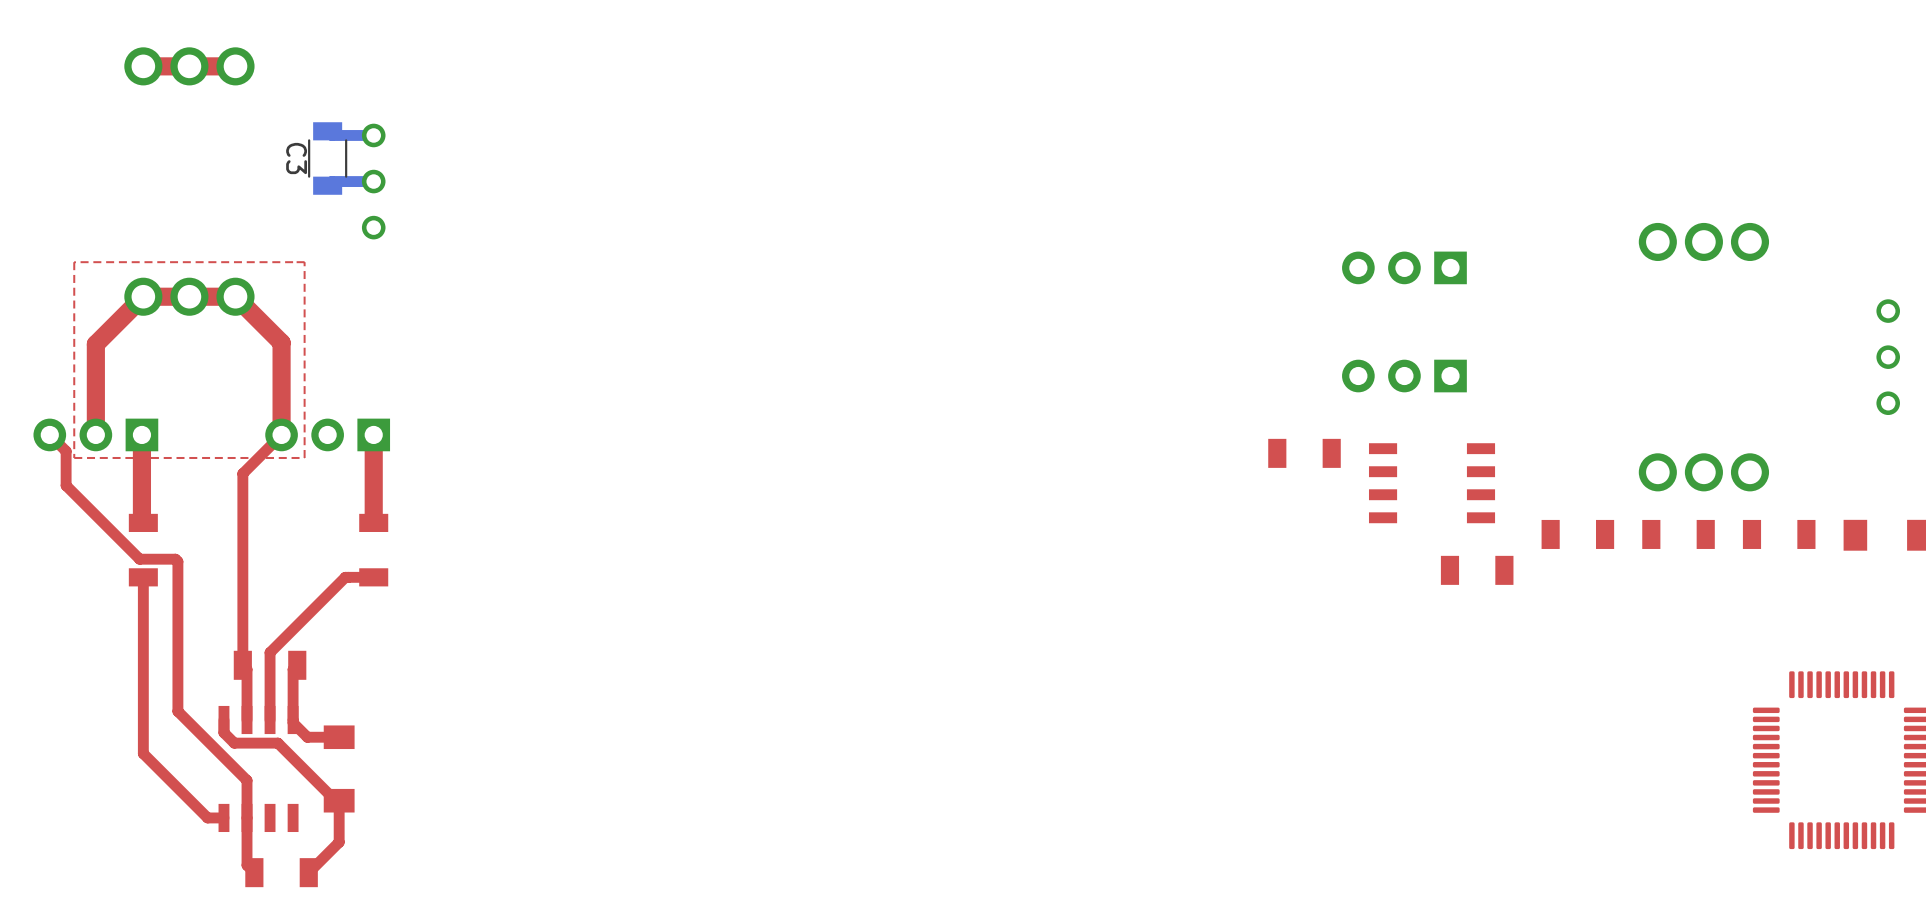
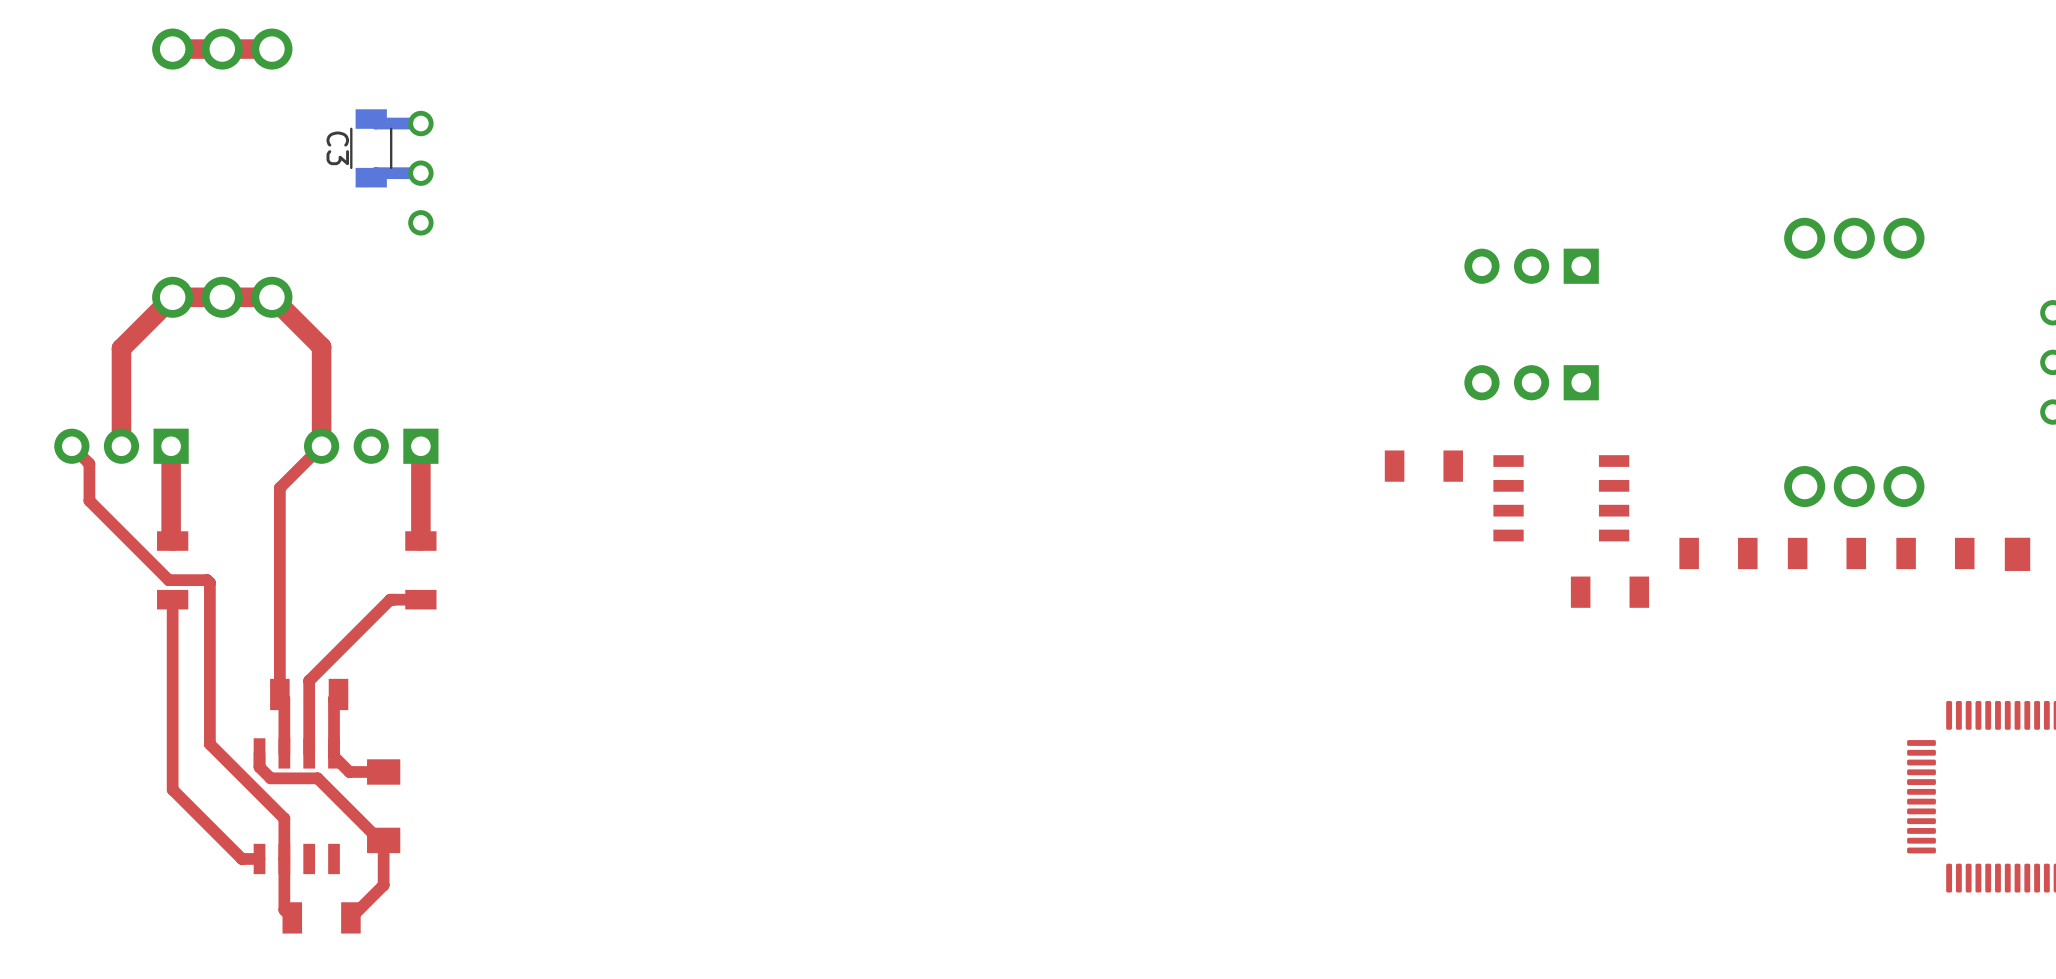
top zone outline: (304, 262) (74, 262) (74, 457) (304, 457) (304, 262) -> none

